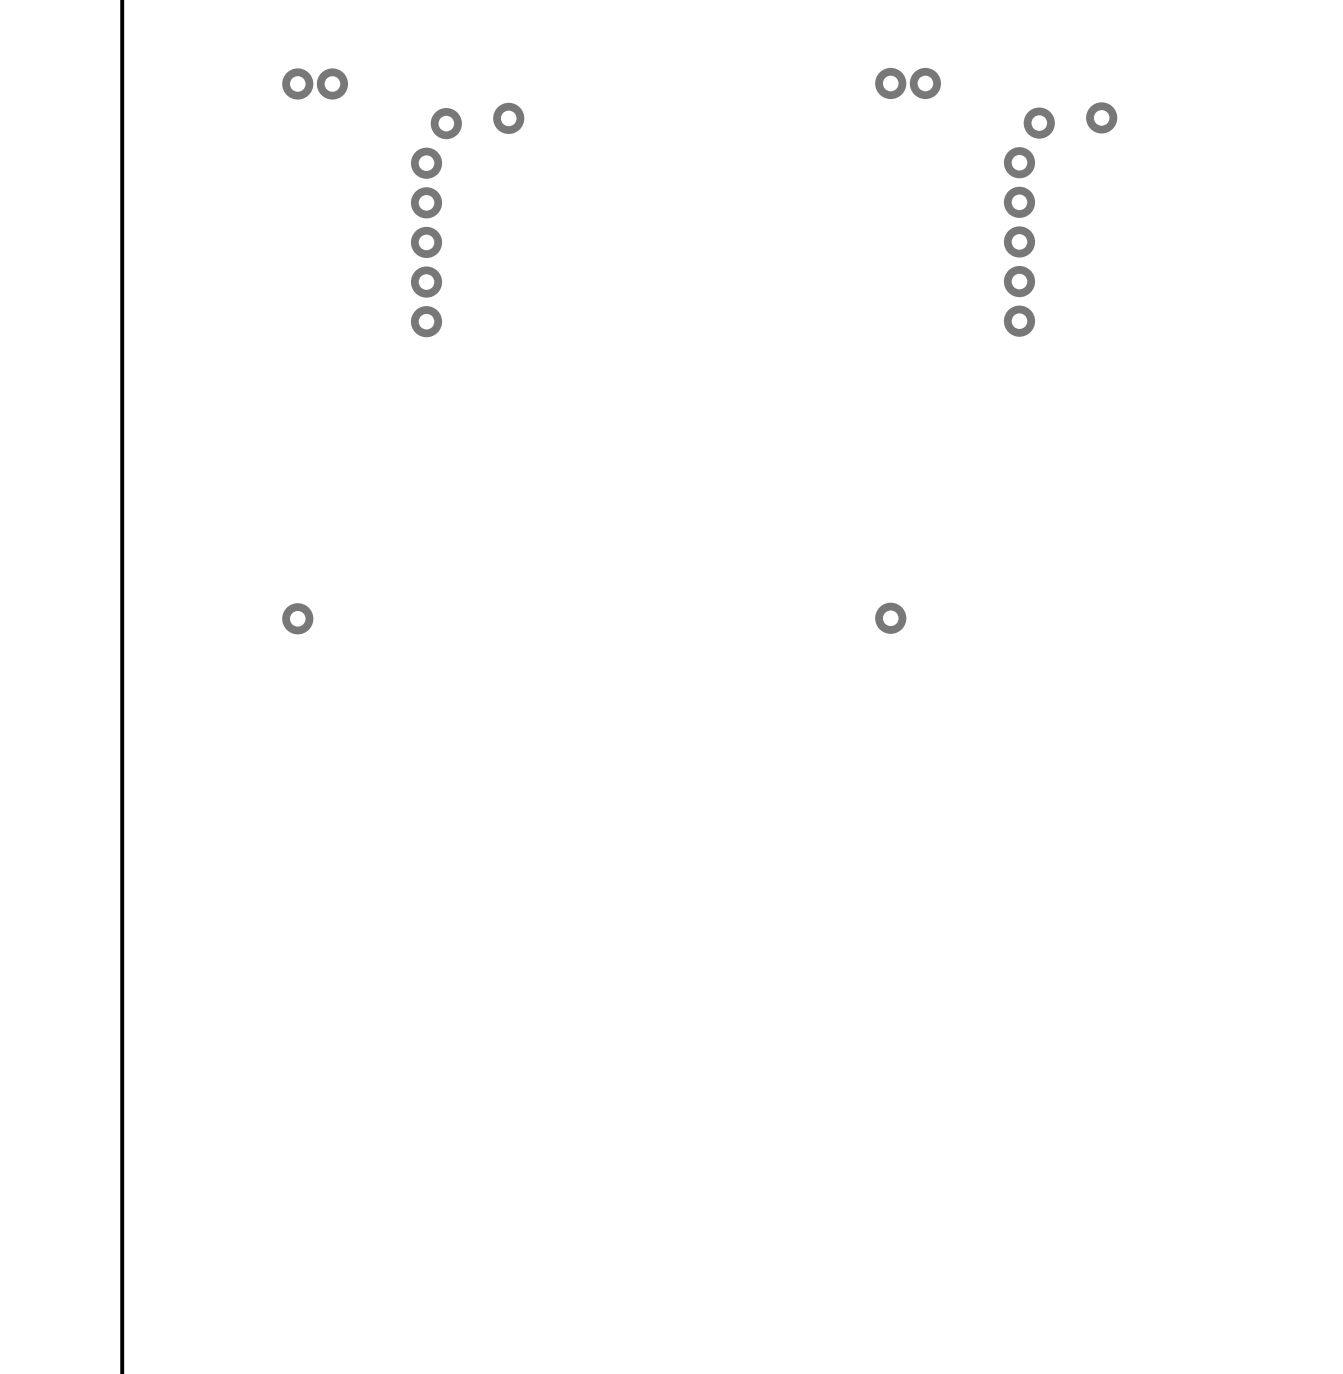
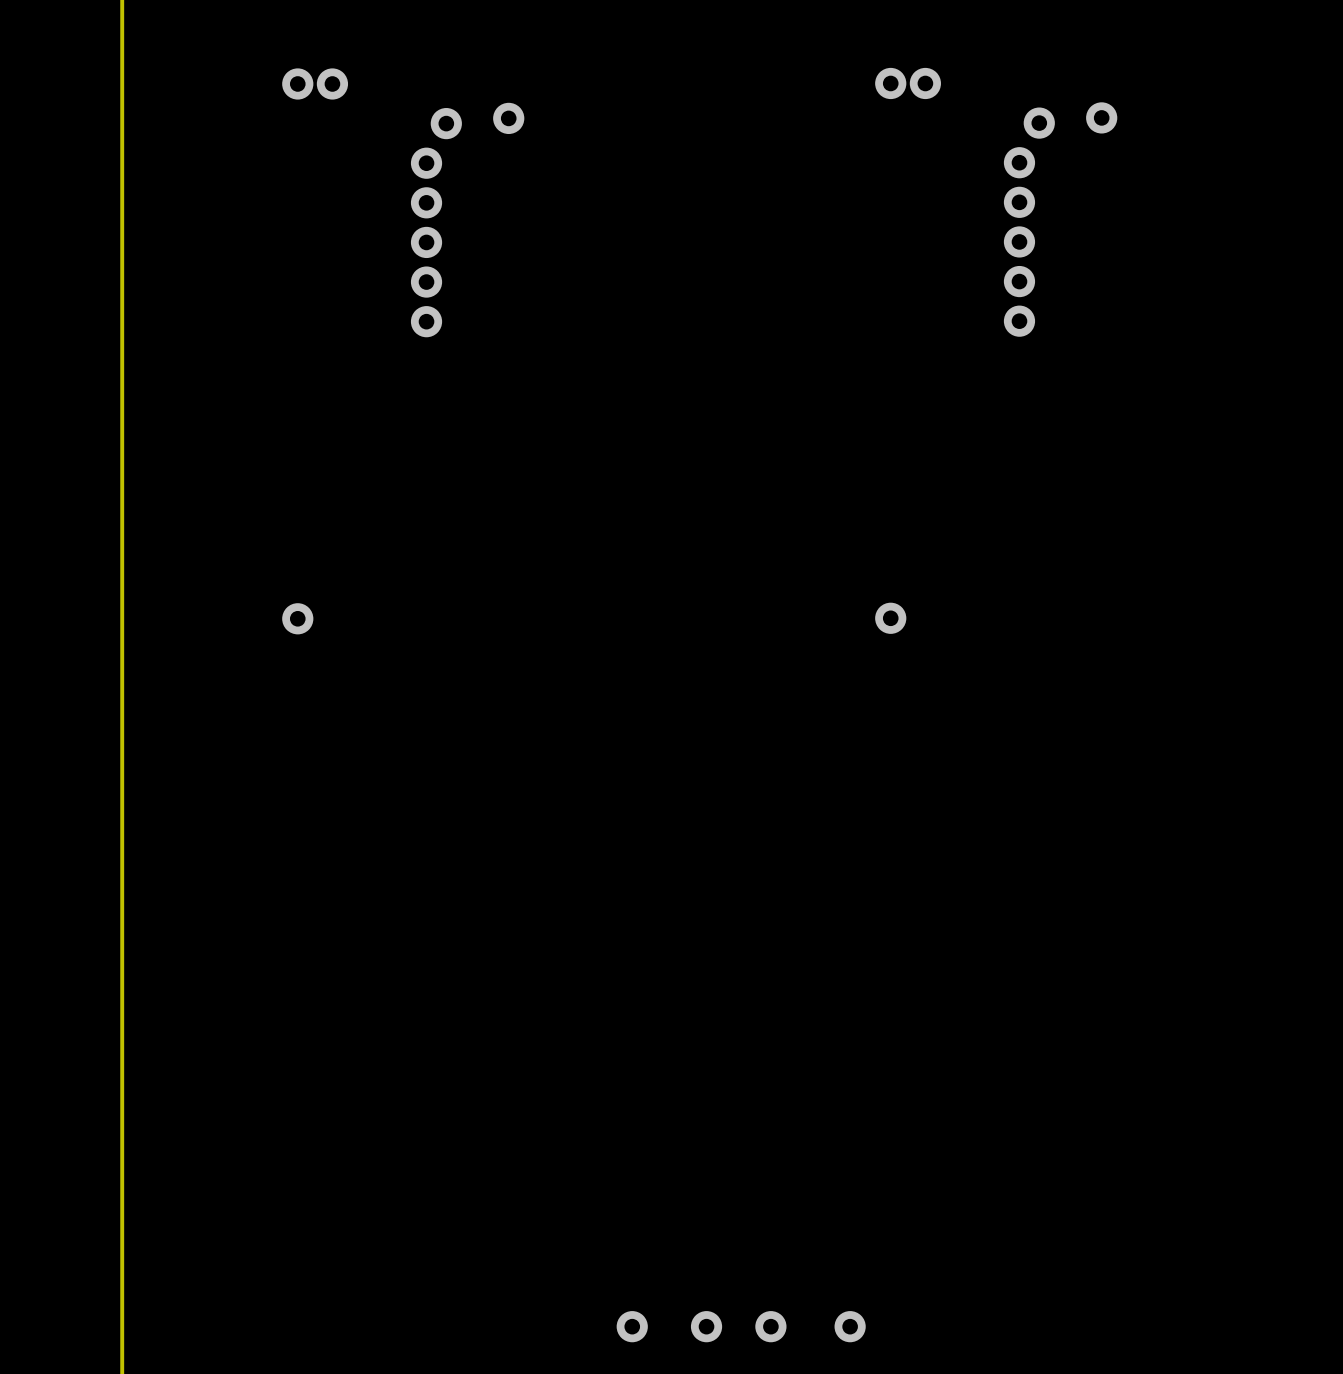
via: none -> (632, 1326)
via: none -> (706, 1326)
via: none -> (770, 1326)
via: none -> (850, 1326)

